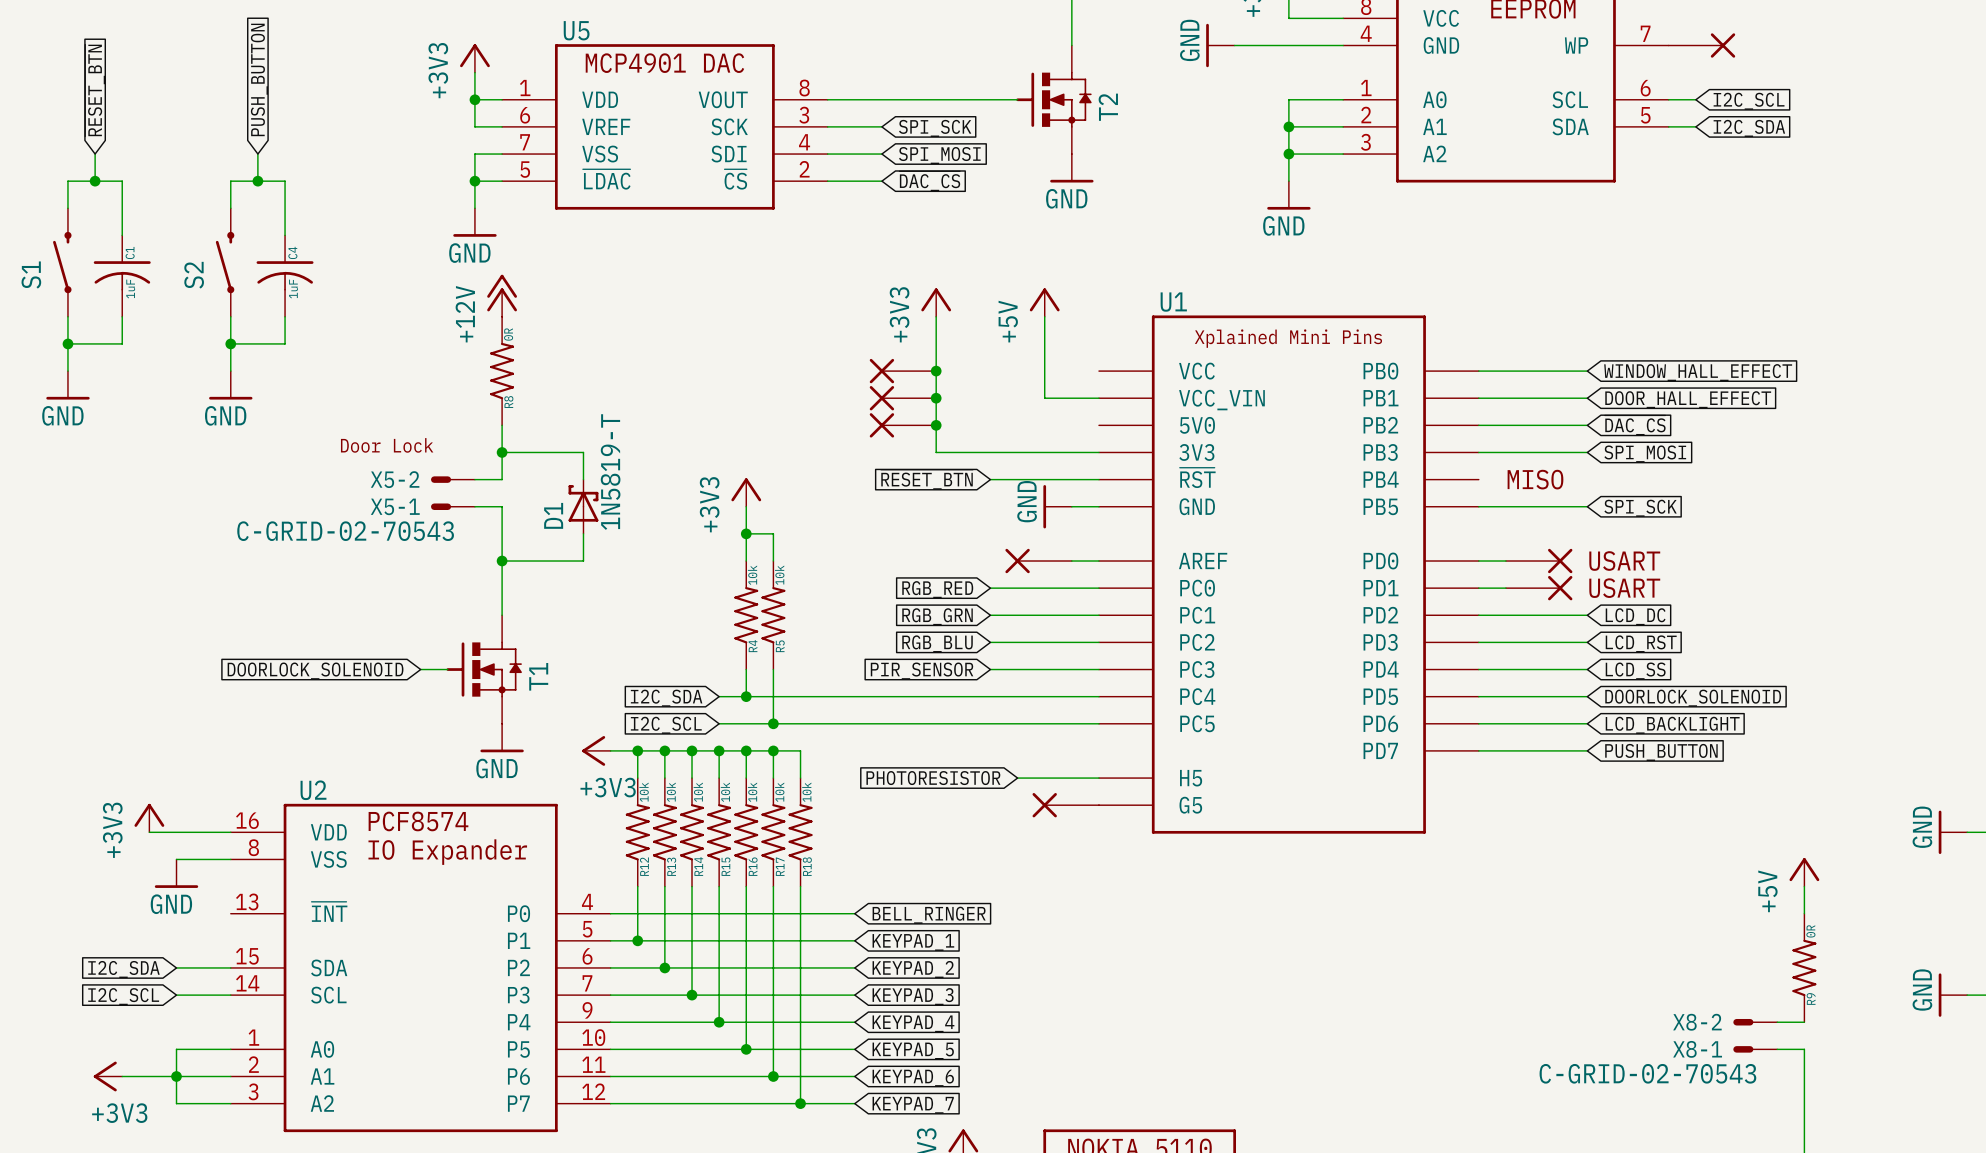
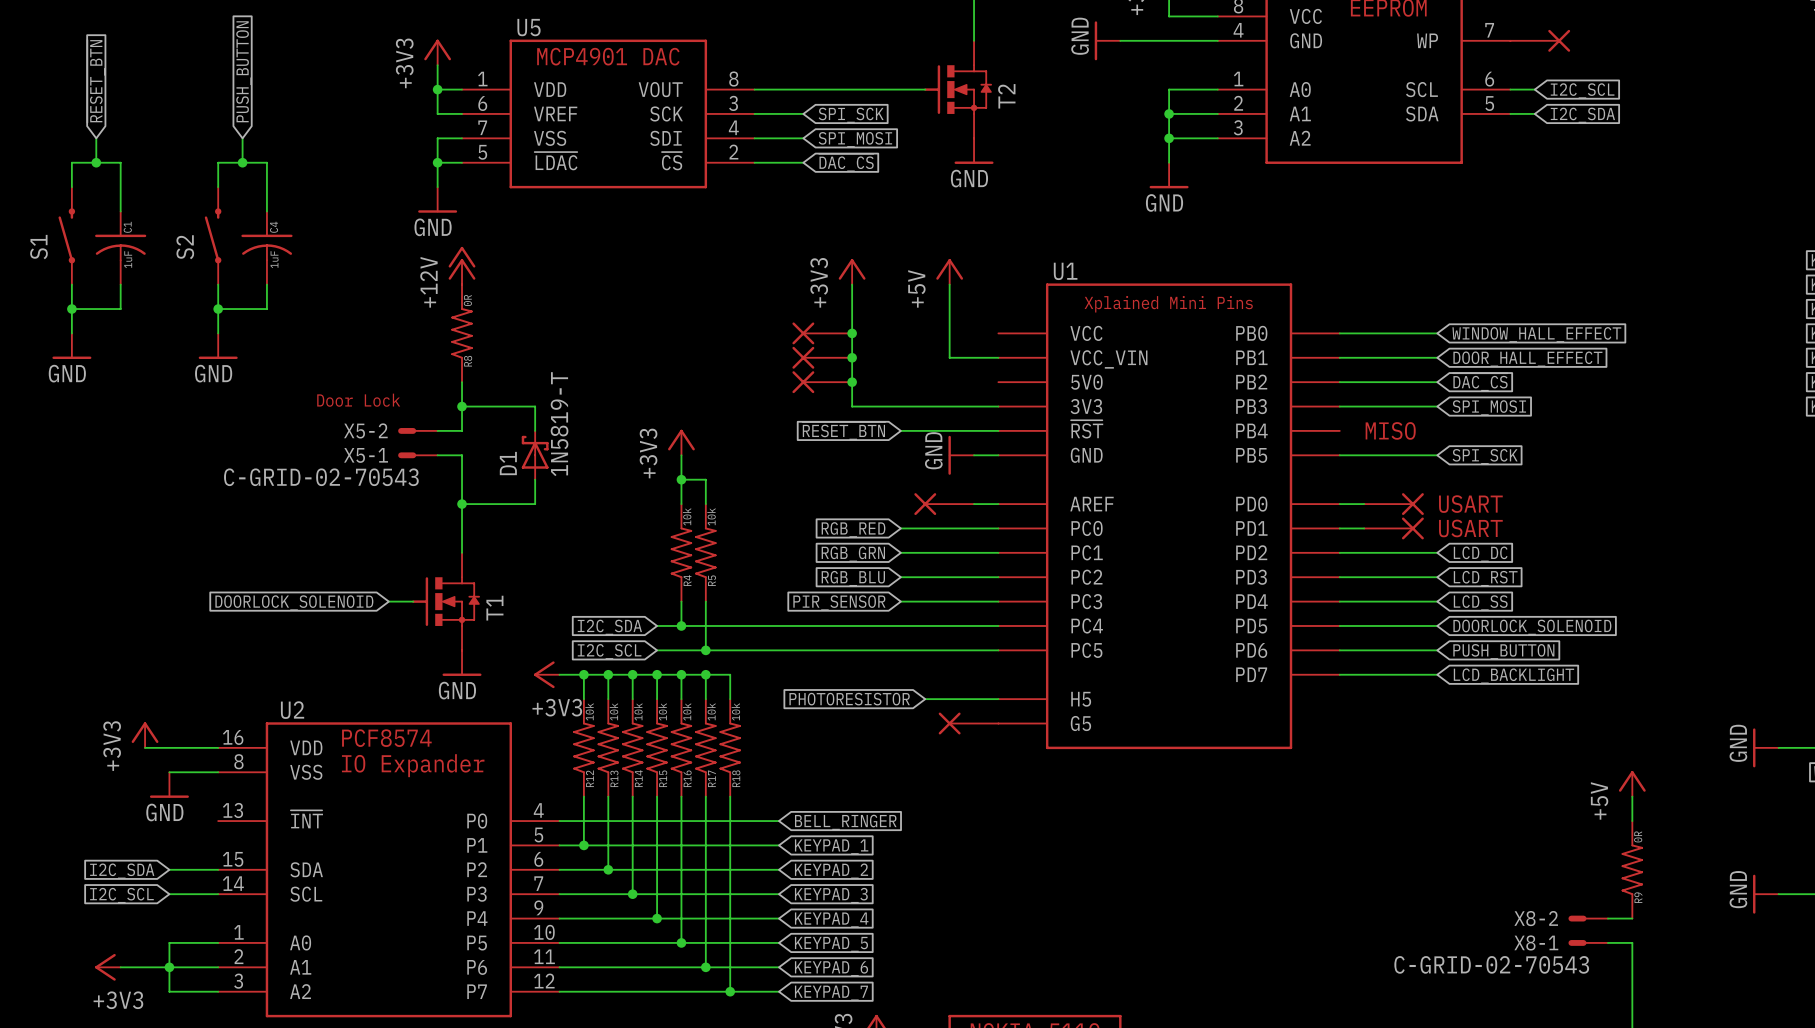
global label: LCD_BACKLIGHT (1672, 725) -> PUSH_BUTTON (1503, 651)
global label: PUSH_BUTTON (1661, 752) -> LCD_BACKLIGHT (1513, 676)

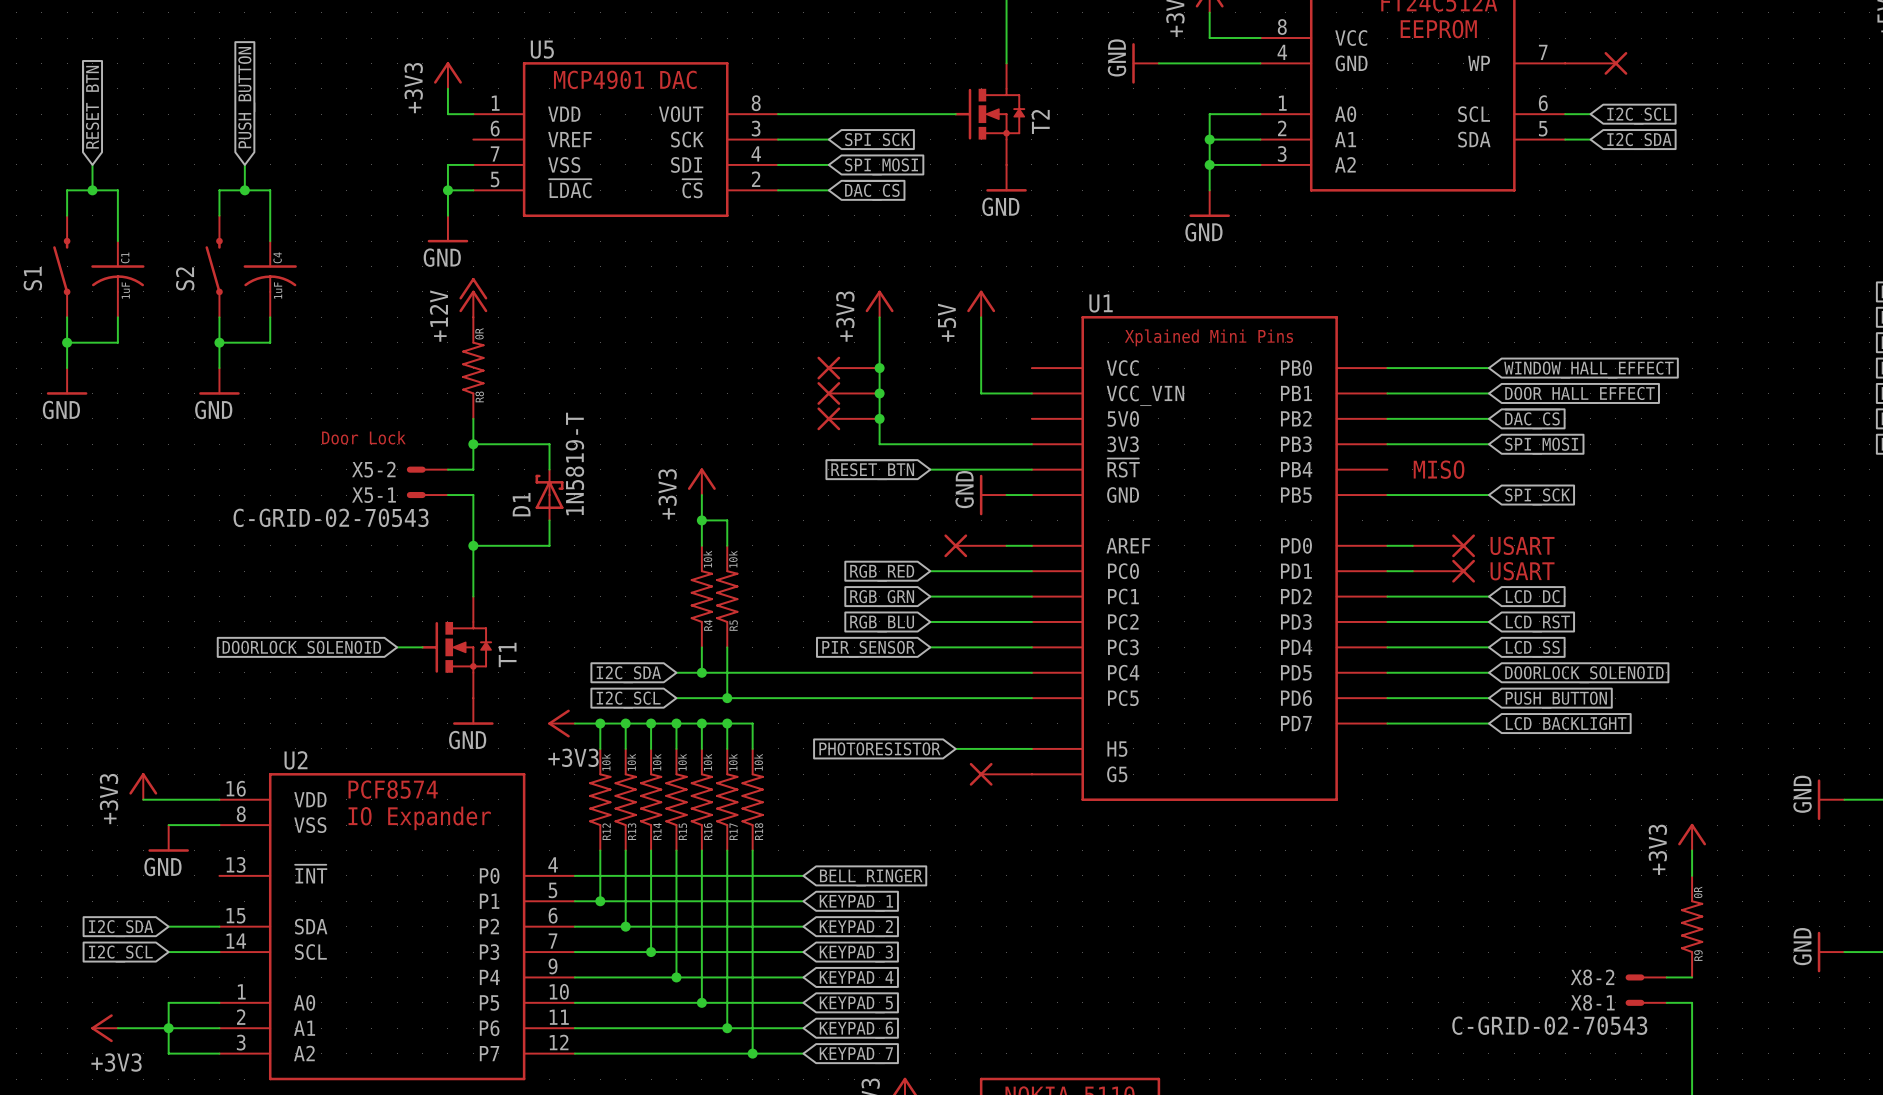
wire: (437, 89) (437, 113) (462, 113) -> none
junction: (437, 89) -> none
power symbol: +5V (1632, 783) -> +3V3 (1692, 837)

